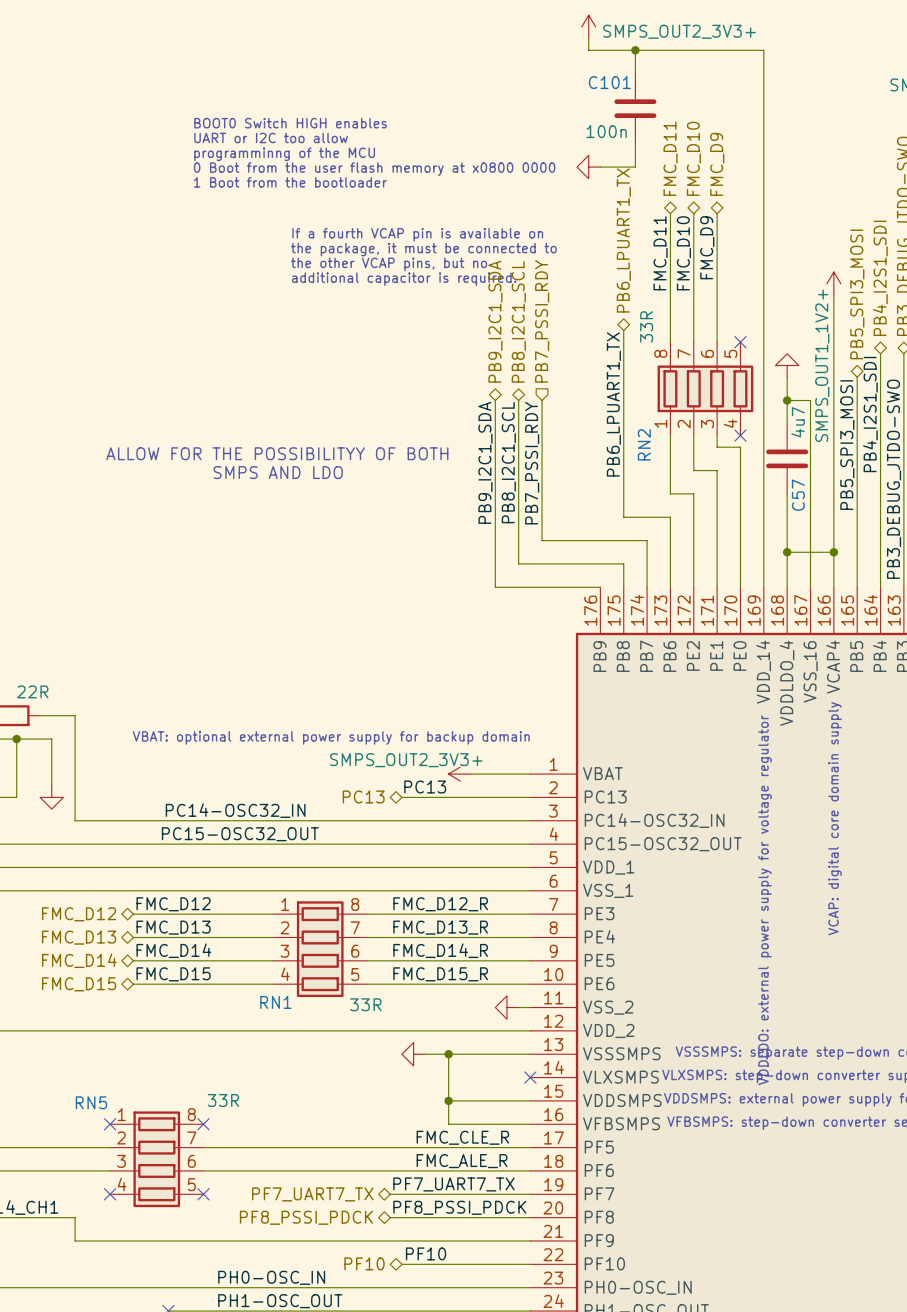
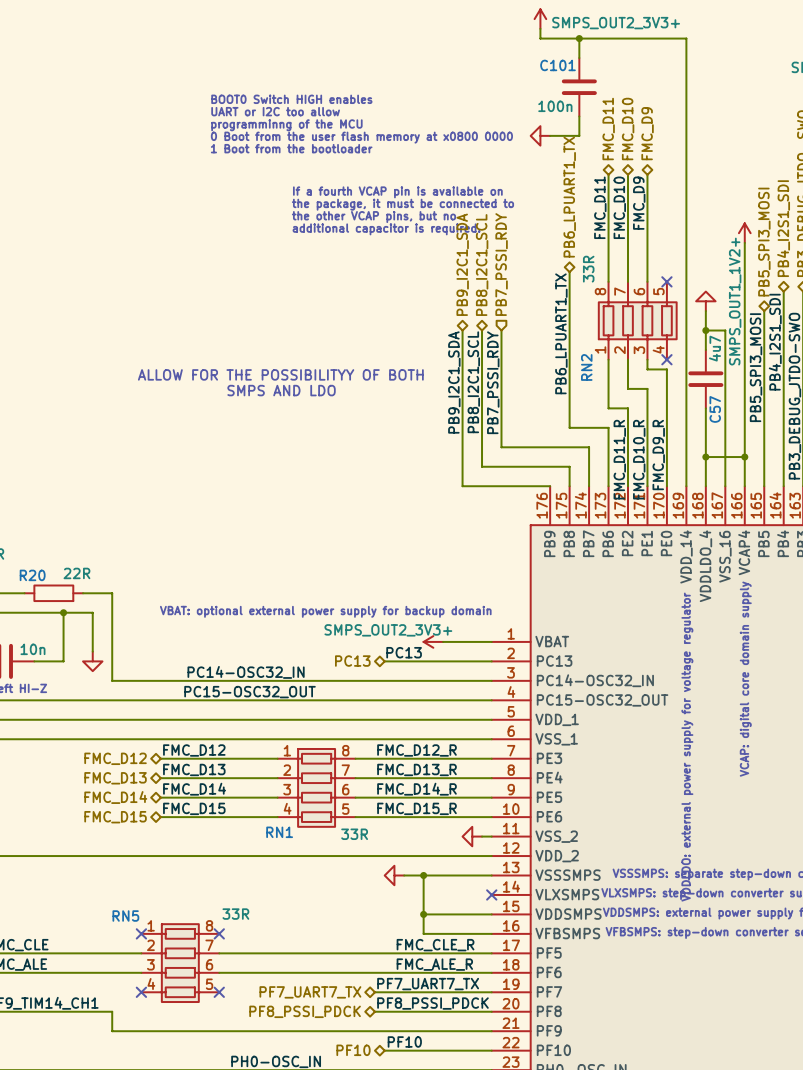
label: none -> FMC_D9_R (658, 455)
label: none -> FMC_D11_R (619, 459)
label: none -> FMC_D10_R (639, 459)

